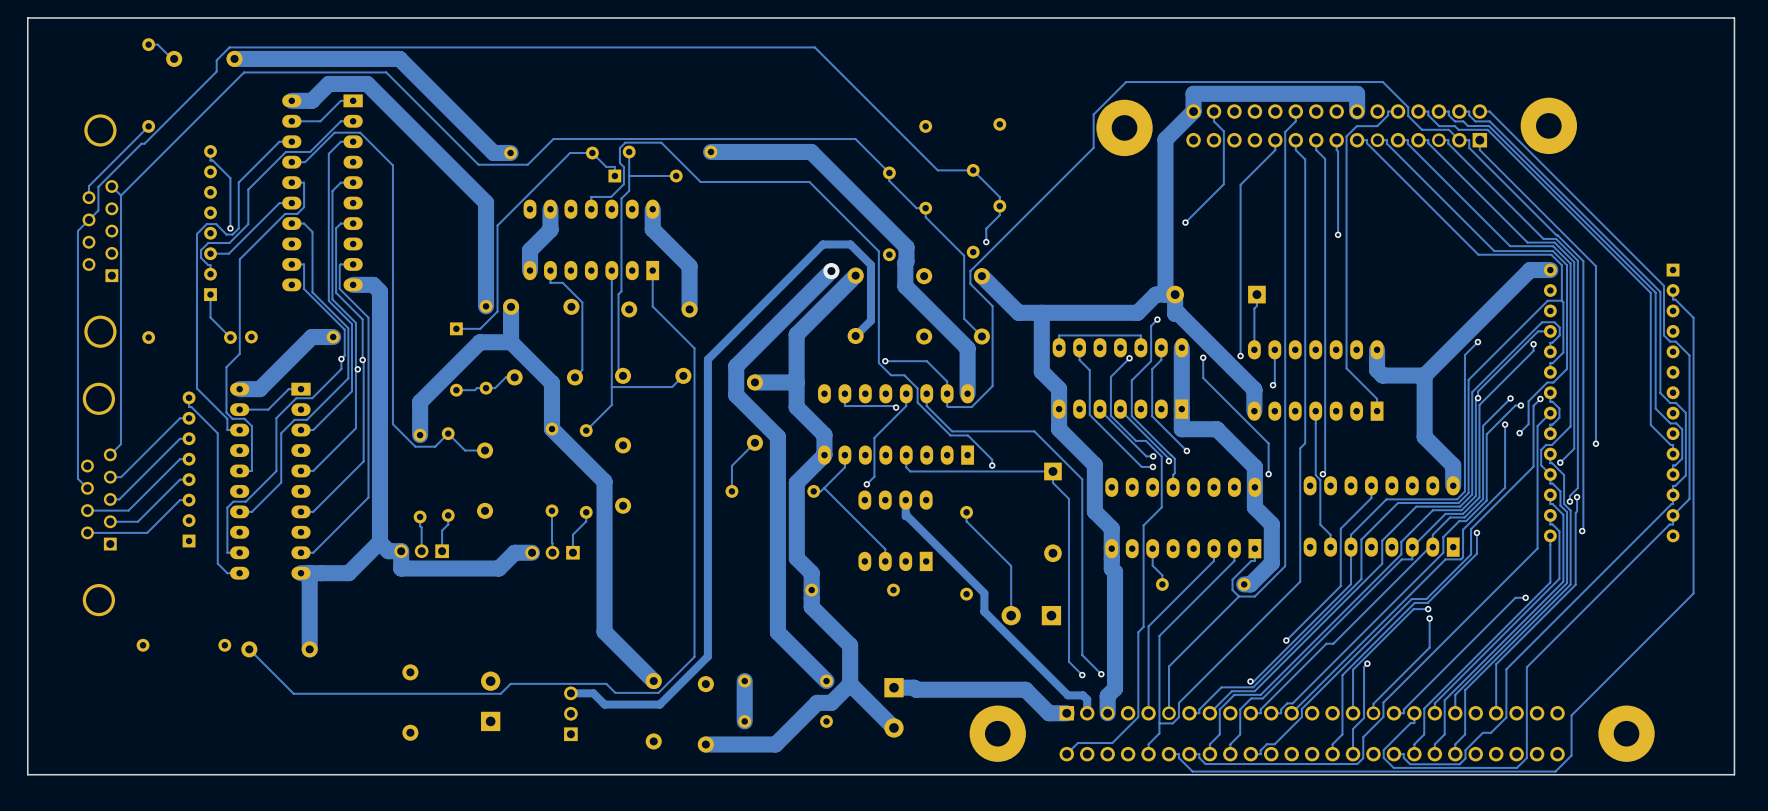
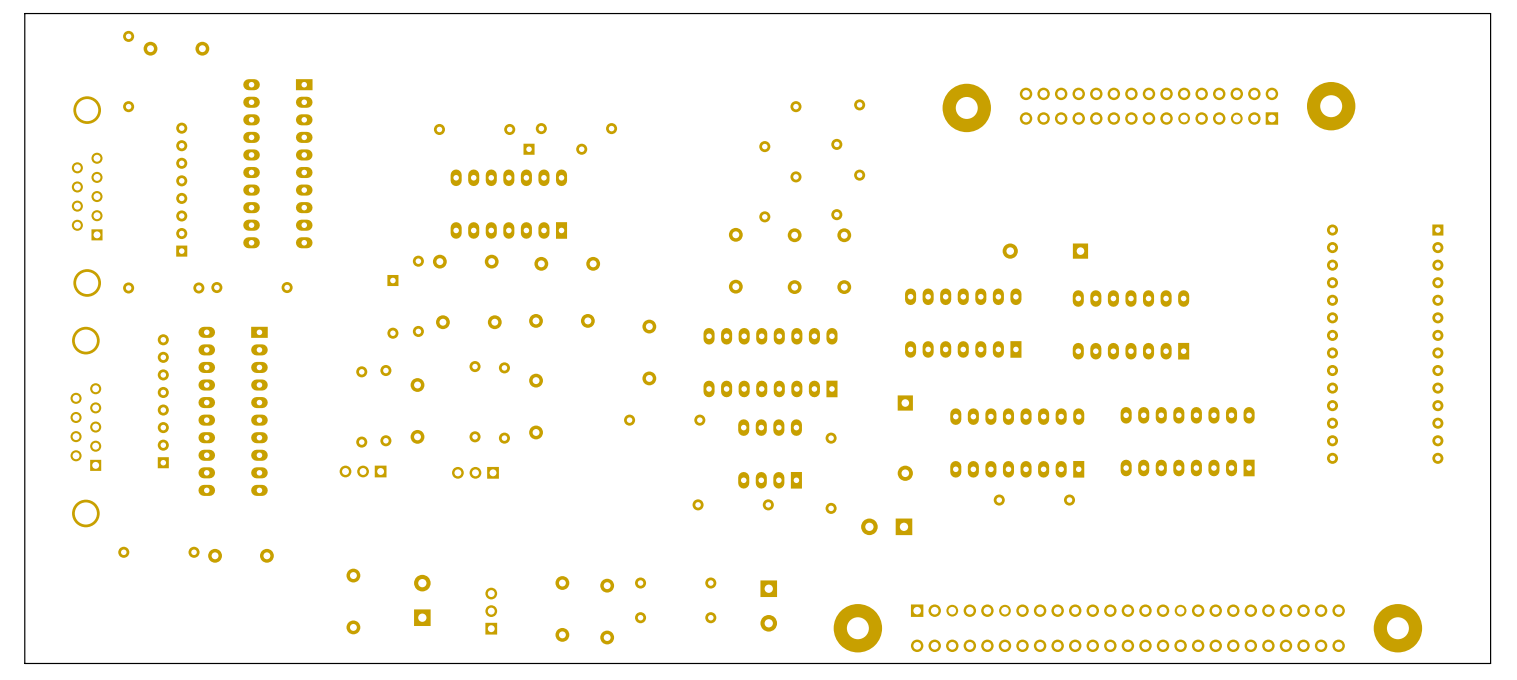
track: (148, 44) (157, 44) (174, 58) -> none
track: (234, 58) (399, 58) (493, 152) (510, 152) -> none
track: (291, 100) (311, 100) (328, 83) (367, 83) (486, 202) (486, 306) -> none
track: (353, 100) (340, 100) (320, 121) (291, 121) -> none
track: (1214, 111) (1214, 121) (1223, 131) (1223, 184) (1185, 222) -> none
track: (1295, 111) (1295, 121) (1285, 131) (1285, 566) (1254, 596) (1238, 596) -> none
track: (1357, 111) (1357, 93) (1193, 93) (1193, 111) (1165, 139) (1165, 294) -> none
track: (1398, 111) (1388, 111) (1388, 115) (1377, 126) (1356, 126) (1346, 136) (1346, 368) (1377, 398) (1377, 411) -> none
track: (1418, 111) (1428, 111) (1428, 115) (1439, 126) (1454, 126) (1458, 129) (1487, 129) (1650, 292) (1650, 425) (1670, 445) (1673, 445) (1673, 454) -> none
track: (1438, 111) (1448, 111) (1448, 115) (1454, 121) (1463, 121) (1467, 125) (1488, 125) (1655, 292) (1655, 408) (1670, 423) (1676, 423) (1682, 429) (1682, 458) (1673, 465) (1673, 474) -> none
track: (1459, 111) (1469, 111) (1469, 115) (1475, 121) (1489, 121) (1660, 291) (1660, 393) (1670, 402) (1675, 402) (1685, 412) (1685, 475) (1673, 485) (1673, 504) (1506, 669) (1506, 717) (1491, 732) (1482, 732) (1465, 750) (1465, 758) (1459, 764) (1410, 764) (1403, 757) (1403, 754) (1393, 754) -> none
track: (1479, 111) (1489, 111) (1663, 285) (1663, 335) (1670, 341) (1675, 341) (1689, 355) (1689, 498) (1673, 515) (1673, 524) (1669, 524) (1526, 667) (1526, 758) (1516, 767) (1393, 767) (1383, 757) (1383, 750) (1410, 723) (1414, 723) (1414, 713) -> none
track: (353, 121) (340, 121) (310, 151) (285, 151) (248, 189) (248, 224) (229, 242) (208, 242) (201, 250) (201, 257) (210, 265) (210, 274) -> none
track: (148, 126) (88, 186) (88, 197) -> none
track: (1275, 140) (1275, 150) (1240, 184) (1240, 355) -> none
track: (1295, 140) (1295, 150) (1305, 159) (1305, 443) (1300, 448) (1300, 581) (1178, 702) (1178, 717) (1172, 723) (1159, 723) -> none
track: (1316, 140) (1316, 150) (1325, 159) (1325, 471) (1322, 474) -> none
track: (1336, 140) (1338, 234) -> none
track: (1357, 140) (1366, 140) (1366, 143) (1478, 254) (1551, 254) (1561, 265) (1561, 300) -> none
track: (1377, 140) (1387, 140) (1387, 143) (1494, 251) (1552, 251) (1566, 265) (1566, 368) (1553, 382) (1547, 382) (1528, 401) (1528, 424) (1519, 433) -> none
track: (1398, 140) (1407, 140) (1407, 143) (1510, 246) (1553, 246) (1570, 263) (1570, 426) (1551, 445) (1546, 445) (1541, 449) (1541, 465) (1550, 474) (1550, 483) (1560, 491) (1560, 505) (1567, 512) (1567, 583) (1455, 694) (1455, 713) -> none
track: (1418, 140) (1428, 140) (1428, 143) (1527, 242) (1554, 242) (1574, 262) (1574, 448) (1560, 462) -> none
track: (1438, 140) (1448, 140) (1448, 143) (1543, 238) (1556, 238) (1577, 260) (1577, 488) (1569, 496) (1569, 501) -> none
track: (1479, 140) (1479, 150) (1595, 266) (1595, 443) -> none
track: (291, 141) (279, 141) (238, 182) (238, 228) (232, 234) (226, 234) (216, 224) (206, 224) (196, 233) (196, 388) (227, 418) (227, 430) (239, 430) -> none
track: (353, 141) (340, 141) (328, 153) (328, 300) (351, 324) (351, 391) (313, 430) (301, 430) -> none
track: (210, 151) (210, 160) (212, 160) (230, 178) (230, 228) -> none
track: (629, 151) (629, 190) (621, 198) (621, 291) (618, 294) (618, 371) (623, 375) -> none
track: (710, 151) (811, 151) (906, 247) (905, 286) (967, 348) (967, 393) -> none
track: (291, 162) (305, 162) (334, 132) (360, 132) (392, 165) (392, 424) (415, 446) (435, 446) (448, 433) (465, 450) (485, 450) -> none
track: (973, 170) (937, 170) (814, 47) (229, 47) (216, 60) (216, 71) (98, 186) (98, 210) (77, 230) (77, 478) (87, 488) -> none
track: (973, 170) (999, 197) (999, 215) (986, 228) (986, 242) -> none
track: (614, 175) (614, 166) (606, 166) (592, 152) (570, 152) (497, 225) (497, 311) (480, 328) (456, 328) -> none
track: (676, 175) (629, 175) -> none
track: (291, 182) (304, 182) (304, 207) (297, 213) (285, 213) (239, 259) (239, 353) (226, 367) (226, 412) (232, 418) (244, 418) (251, 426) (251, 470) (239, 470) -> none
track: (353, 182) (340, 182) (332, 191) (332, 299) (355, 322) (355, 428) (313, 470) (301, 470) -> none
track: (111, 186) (120, 195) -> none
track: (120, 195) (244, 72) (386, 72) (478, 164) (527, 164) (553, 139) (855, 139) (889, 172) (889, 180) (916, 208) (925, 208) (925, 217) (964, 255) (964, 318) (981, 336) -> none
track: (120, 195) (120, 444) (110, 454) -> none
track: (291, 203) (279, 203) (228, 253) (210, 253) -> none
track: (550, 209) (550, 229) (530, 250) (530, 270) -> none
track: (591, 209) (591, 196) (611, 196) (623, 184) (623, 167) (619, 163) (619, 148) (625, 142) (661, 142) (700, 181) (809, 181) (878, 251) (878, 363) (891, 375) (904, 375) (917, 388) (917, 402) (950, 435) (967, 435) (992, 459) (992, 465) -> none
track: (652, 209) (652, 229) (689, 266) (689, 309) -> none
via: (1185, 222) -> none
track: (291, 223) (304, 223) (312, 231) (312, 292) (348, 328) (348, 378) (306, 419) (294, 419) (281, 433) (281, 482) (251, 511) (239, 511) -> none
track: (353, 223) (340, 223) (336, 228) (336, 292) (362, 319) (363, 461) (313, 511) (301, 511) -> none
via: (230, 228) -> none
via: (1338, 234) -> none
via: (986, 242) -> none
track: (291, 264) (304, 264) (304, 289) (344, 329) (344, 355) (341, 358) (341, 369) (312, 398) (296, 398) (276, 418) (276, 471) (245, 501) (233, 501) (227, 507) (227, 552) (239, 552) -> none
track: (353, 264) (339, 265) (339, 288) (368, 317) (368, 497) (313, 552) (301, 552) -> none
track: (550, 270) (550, 282) (562, 282) (582, 302) (582, 370) (575, 377) -> none
track: (611, 270) (611, 405) (586, 430) -> none
track: (652, 270) (652, 306) (694, 348) (694, 656) (658, 692) (615, 692) (606, 683) (510, 683) (500, 693) (293, 693) (249, 649) -> none
track: (1550, 270) (1530, 270) (1424, 375) -> none
track: (831, 271) (736, 366) (736, 395) (777, 436) (777, 632) (826, 681) -> none
via: (831, 271) -> none
track: (855, 275) (796, 334) (796, 407) (824, 434) (824, 455) (796, 482) (796, 558) (811, 573) (811, 606) (850, 645) (850, 684) -> none
track: (981, 276) (1018, 312) (1137, 312) (1155, 294) (1175, 294) (1175, 313) (1178, 313) (1254, 389) (1254, 411) -> none
track: (353, 284) (373, 284) (379, 291) (379, 541) (348, 573) (301, 573) -> none
track: (1673, 290) (1673, 299) (1675, 299) (1693, 317) (1693, 593) (1571, 715) (1571, 755) (1555, 771) (1192, 771) (1178, 757) (1178, 754) (1169, 754) -> none
track: (210, 294) (210, 317) (230, 337) -> none
track: (1256, 294) (1256, 306) (1254, 308) (1254, 349) -> none
track: (1561, 300) (1547, 300) (1468, 379) (1468, 493) (1458, 502) (1398, 502) (1361, 539) (1361, 579) (1253, 687) (1221, 687) (1199, 709) (1199, 713) (1189, 713) -> none
track: (1561, 300) (1563, 352) (1550, 363) (1550, 372) -> none
track: (511, 306) (511, 342) -> none
track: (1041, 312) (1041, 371) (1059, 388) (1059, 429) (1094, 464) (1094, 511) (1111, 528) (1111, 568) (1115, 572) (1115, 688) (1107, 695) (1107, 713) -> none
track: (1157, 319) (1151, 325) (1151, 361) (1131, 380) (1131, 416) (1174, 458) (1173, 487) -> none
via: (1157, 319) -> none
track: (1550, 331) (1538, 331) (1478, 391) (1478, 398) (1475, 400) (1475, 496) (1461, 510) (1432, 510) (1401, 541) (1401, 554) (1260, 694) (1234, 694) (1219, 709) (1219, 734) (1209, 744) (1209, 754) -> none
track: (855, 336) (870, 320) (870, 264) (850, 244) (822, 244) (707, 359) (707, 656) (659, 704) (604, 704) (593, 693) (570, 693) -> none
track: (333, 337) (311, 337) (259, 389) (239, 389) -> none
track: (511, 342) (480, 342) (420, 402) (420, 435) -> none
track: (511, 342) (551, 383) (551, 429) (604, 481) (604, 631) (653, 681) -> none
track: (1477, 342) (1464, 355) (1464, 491) (1457, 499) (1386, 499) (1351, 534) (1351, 584) (1253, 681) (1250, 681) -> none
via: (1477, 342) -> none
track: (1533, 344) (1533, 350) (1479, 404) (1479, 497) (1463, 513) (1445, 513) (1412, 547) (1412, 559) (1401, 559) (1262, 698) (1251, 698) (1240, 709) (1240, 734) (1230, 744) (1230, 754) -> none
via: (1533, 344) -> none
track: (1079, 347) (1079, 360) (1089, 370) (1089, 414) (1141, 466) (1152, 466) -> none
track: (1140, 347) (1140, 335) (1059, 335) (1059, 347) -> none
track: (1161, 347) (1161, 360) (1152, 369) (1152, 416) (1186, 450) -> none
track: (1181, 347) (1181, 429) (1216, 429) (1254, 467) (1254, 507) (1271, 524) (1271, 563) (1250, 584) (1244, 584) -> none
track: (1274, 349) (1274, 383) (1273, 385) -> none
track: (1377, 349) (1377, 369) (1382, 375) (1424, 375) -> none
track: (1550, 351) (1550, 342) (1559, 335) (1559, 327) (1554, 322) (1542, 322) (1472, 392) (1472, 494) (1460, 506) (1416, 506) (1382, 540) (1382, 563) (1254, 691) (1231, 691) (1209, 713) -> none
via: (1240, 355) -> none
track: (1203, 357) (1203, 378) (1268, 443) (1268, 474) -> none
via: (1203, 357) -> none
via: (341, 358) -> none
track: (1129, 358) (1110, 376) (1110, 415) (1136, 440) (1146, 440) (1161, 456) (1161, 507) (1143, 525) (1143, 626) (1138, 632) (1138, 717) (1112, 743) (1077, 743) (1066, 754) -> none
via: (1129, 358) -> none
via: (362, 360) -> none
track: (885, 361) (926, 361) (947, 381) (948, 407) (971, 407) (992, 386) (992, 306) (970, 283) (970, 271) (1093, 147) (1093, 114) (1126, 82) (1382, 82) (1408, 107) (1408, 116) (1422, 129) (1448, 129) (1459, 140) (1469, 140) (1469, 147) (1583, 261) (1582, 531) -> none
via: (885, 361) -> none
via: (357, 369) -> none
track: (683, 375) (672, 387) (611, 387) -> none
track: (1424, 375) (1424, 437) (1453, 465) (1453, 485) -> none
track: (514, 377) (505, 377) (495, 388) (456, 390) -> none
track: (796, 382) (754, 382) -> none
via: (1273, 385) -> none
track: (301, 389) (288, 389) (268, 409) (239, 409) -> none
track: (1550, 392) (1550, 401) (1559, 408) (1559, 417) (1550, 424) (1550, 433) -> none
track: (844, 393) (844, 406) (896, 407) -> none
track: (906, 393) (906, 406) (874, 437) (874, 476) (866, 484) -> none
track: (926, 393) (926, 406) (952, 431) (1034, 431) (1082, 479) (1082, 655) (1101, 674) -> none
track: (189, 397) (189, 406) (191, 406) (217, 433) (217, 563) (227, 573) (239, 573) -> none
via: (1478, 398) -> none
track: (1510, 398) (1483, 425) (1483, 499) (1464, 517) (1450, 517) (1432, 534) (1432, 547) -> none
via: (1510, 398) -> none
track: (1540, 399) (1533, 405) (1533, 466) (1471, 529) (1471, 554) (1426, 599) (1411, 599) (1301, 708) (1301, 717) (1274, 744) (1266, 744) (1260, 750) (1260, 754) (1250, 754) -> none
via: (1540, 399) -> none
track: (1520, 405) (1515, 405) (1486, 434) (1486, 500) (1466, 521) (1459, 521) (1443, 537) (1443, 552) (1292, 703) (1287, 703) (1281, 709) (1281, 713) (1271, 713) -> none
via: (1520, 405) -> none
via: (896, 407) -> none
track: (1099, 409) (1146, 456) (1153, 456) -> none
track: (1120, 409) (1168, 458) (1168, 461) -> none
track: (1315, 411) (1315, 475) (1320, 479) (1320, 524) (1330, 534) (1330, 547) -> none
track: (1550, 413) (1537, 426) (1537, 548) (1383, 702) (1383, 716) (1363, 737) (1363, 758) (1357, 764) (1205, 764) (1199, 757) (1199, 754) (1189, 754) -> none
track: (189, 418) (179, 418) (121, 477) (110, 477) -> none
track: (1505, 424) (1505, 487) (1463, 529) (1463, 557) (1460, 559) (1445, 559) (1291, 713) -> none
via: (1505, 424) -> none
via: (1519, 433) -> none
track: (189, 438) (179, 438) (119, 499) (110, 499) -> none
track: (754, 442) (731, 465) (731, 491) -> none
via: (1595, 443) -> none
via: (1186, 450) -> none
track: (1550, 454) (1550, 463) (1564, 475) (1564, 504) (1570, 510) (1570, 584) (1465, 690) (1465, 734) (1455, 744) (1455, 754) -> none
track: (844, 455) (844, 467) (820, 491) (813, 491) -> none
track: (906, 455) (906, 467) (910, 471) (1052, 471) (1052, 482) (1068, 498) (1068, 661) (1082, 675) -> none
via: (1153, 456) -> none
track: (189, 459) (179, 459) (128, 510) (87, 510) -> none
via: (1168, 461) -> none
via: (1560, 462) -> none
via: (992, 465) -> none
via: (1152, 466) -> none
via: (1268, 474) -> none
via: (1322, 474) -> none
track: (189, 479) (179, 479) (137, 521) (110, 521) -> none
via: (866, 484) -> none
track: (1371, 485) (1371, 498) (1340, 528) (1340, 586) (1286, 640) -> none
track: (824, 488) (885, 549) (885, 561) -> none
track: (1550, 494) (1550, 504) (1563, 514) (1563, 581) (1444, 700) (1444, 734) (1434, 744) (1434, 754) -> none
track: (1577, 497) (1575, 584) (1496, 664) (1496, 713) -> none
via: (1577, 497) -> none
track: (189, 500) (179, 500) (147, 532) (87, 532) -> none
track: (905, 500) (905, 516) (984, 593) (984, 611) (1068, 695) (1083, 695) (1087, 699) (1087, 713) -> none
via: (1569, 501) -> none
track: (551, 510) (552, 552) -> none
track: (586, 512) (586, 521) (572, 534) (572, 552) -> none
track: (966, 512) (966, 521) (1011, 566) (1011, 615) -> none
track: (448, 515) (448, 524) (442, 530) (442, 551) -> none
track: (1550, 515) (1550, 524) (1559, 531) (1559, 578) (1434, 703) (1434, 713) -> none
track: (420, 516) (421, 551) -> none
via: (1582, 531) -> none
track: (1476, 532) (1476, 553) (1427, 602) (1414, 602) (1342, 675) (1342, 734) (1332, 744) (1332, 754) -> none
via: (1476, 532) -> none
track: (1550, 535) (1550, 582) (1424, 708) (1424, 734) (1414, 744) (1414, 754) -> none
track: (379, 542) (388, 551) (401, 551) (401, 568) (498, 568) (514, 552) (532, 552) -> none
track: (1432, 544) (1333, 643) (1326, 643) (1260, 709) (1260, 713) (1250, 713) -> none
track: (1152, 548) (1152, 565) (1162, 575) (1162, 584) -> none
track: (1214, 548) (1214, 560) (1148, 626) (1148, 713) -> none
track: (1234, 548) (1234, 560) (1159, 635) (1159, 733) (1148, 744) (1148, 754) -> none
track: (1254, 548) (1254, 560) (1251, 560) (1232, 579) (1232, 590) (1238, 596) -> none
track: (309, 573) (309, 649) -> none
track: (1238, 596) (1169, 666) (1169, 713) -> none
track: (1525, 597) (1515, 597) (1403, 709) (1403, 713) (1393, 713) -> none
via: (1525, 597) -> none
track: (1428, 609) (1413, 609) (1353, 669) (1353, 713) -> none
via: (1428, 609) -> none
track: (1429, 618) (1429, 647) (1373, 703) (1373, 713) -> none
via: (1429, 618) -> none
via: (1286, 640) -> none
track: (1367, 663) (1364, 667) (1364, 717) (1353, 728) (1353, 754) -> none
via: (1367, 663) -> none
via: (1101, 674) -> none
via: (1082, 675) -> none
track: (744, 681) (744, 721) -> none
via: (1250, 681) -> none
track: (850, 684) (893, 727) -> none
track: (850, 684) (831, 702) (817, 702) (775, 744) (705, 744) -> none
track: (893, 687) (914, 687) (916, 689) (1025, 689) (1049, 713) (1066, 713) -> none

